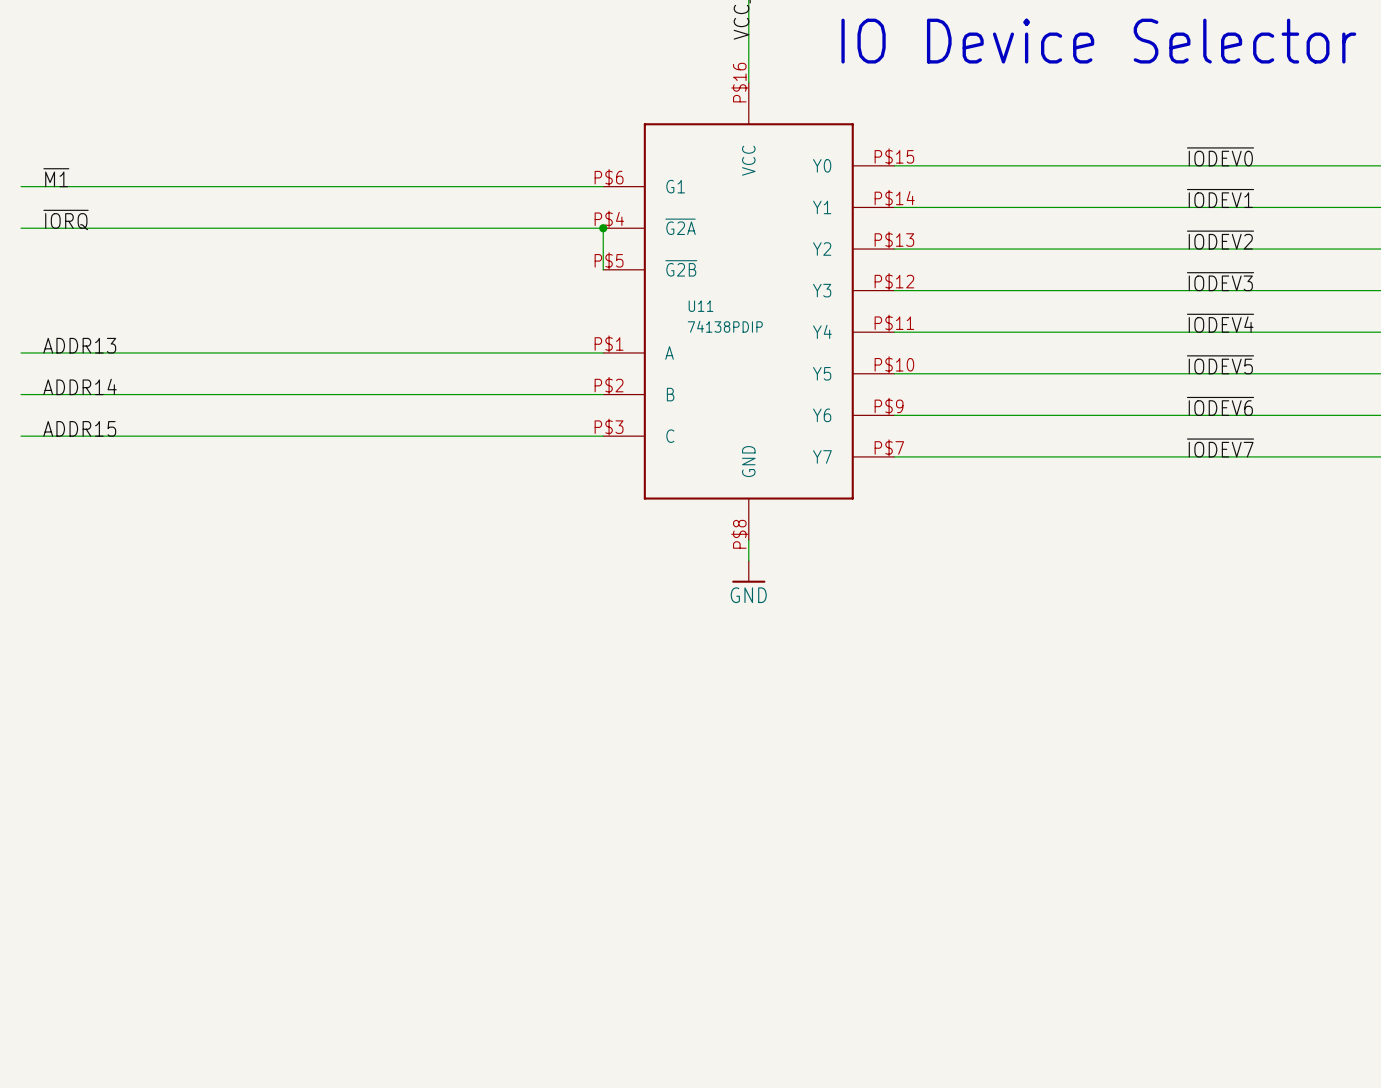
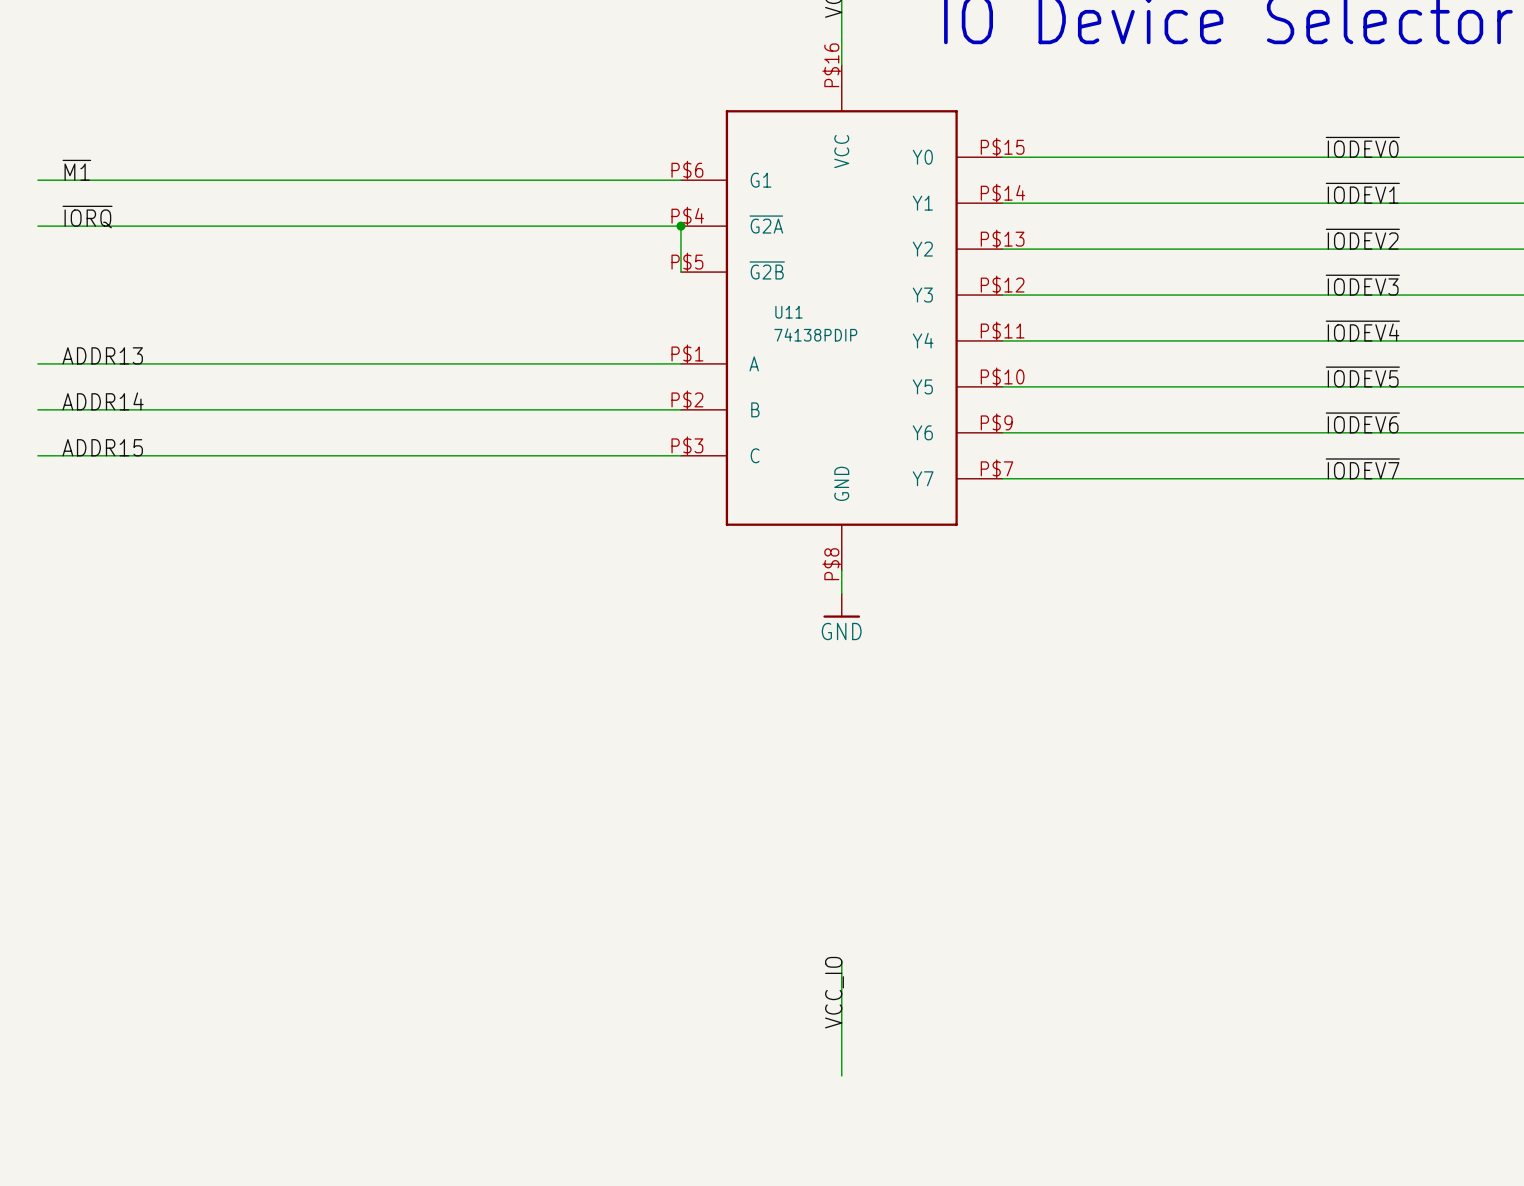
wire: none -> (841, 961) (841, 1075)
label: none -> VCC_IO (834, 992)

